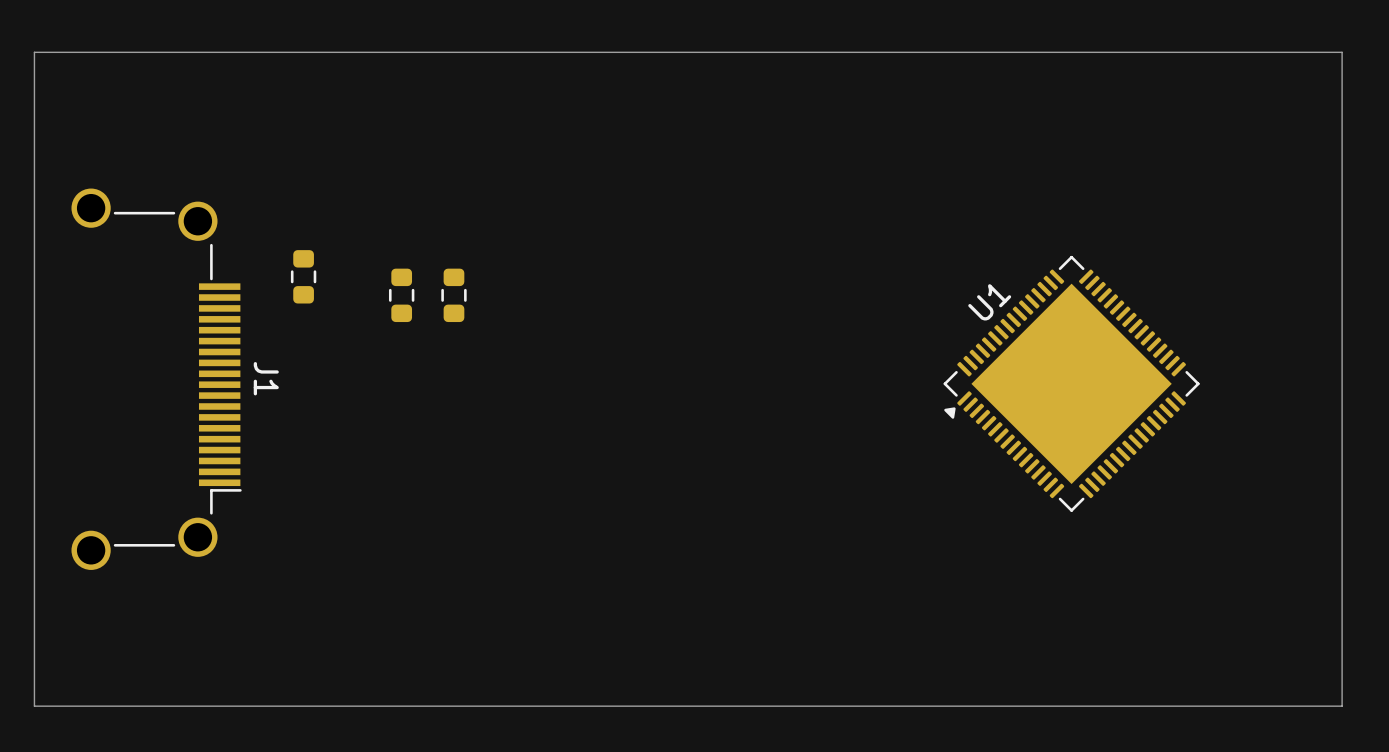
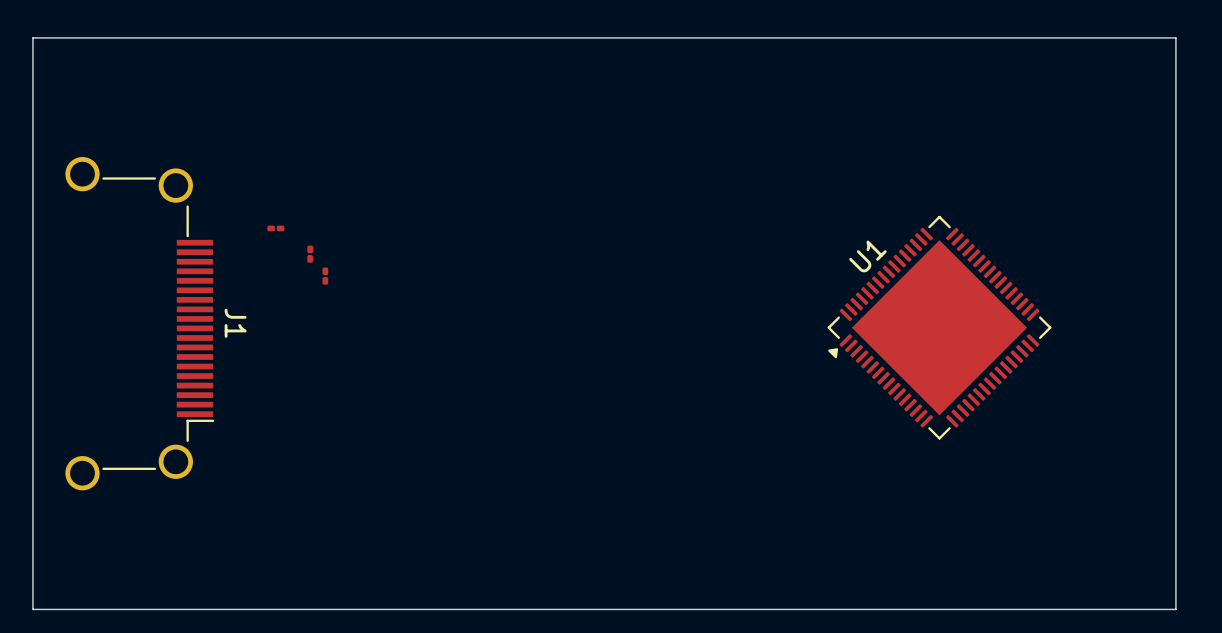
part footprint: [290, 250, 317, 304] -> [267, 225, 285, 232]
part: (401, 295) -> none
part: (453, 295) -> none
part: none -> (310, 254)
part: none -> (325, 276)

